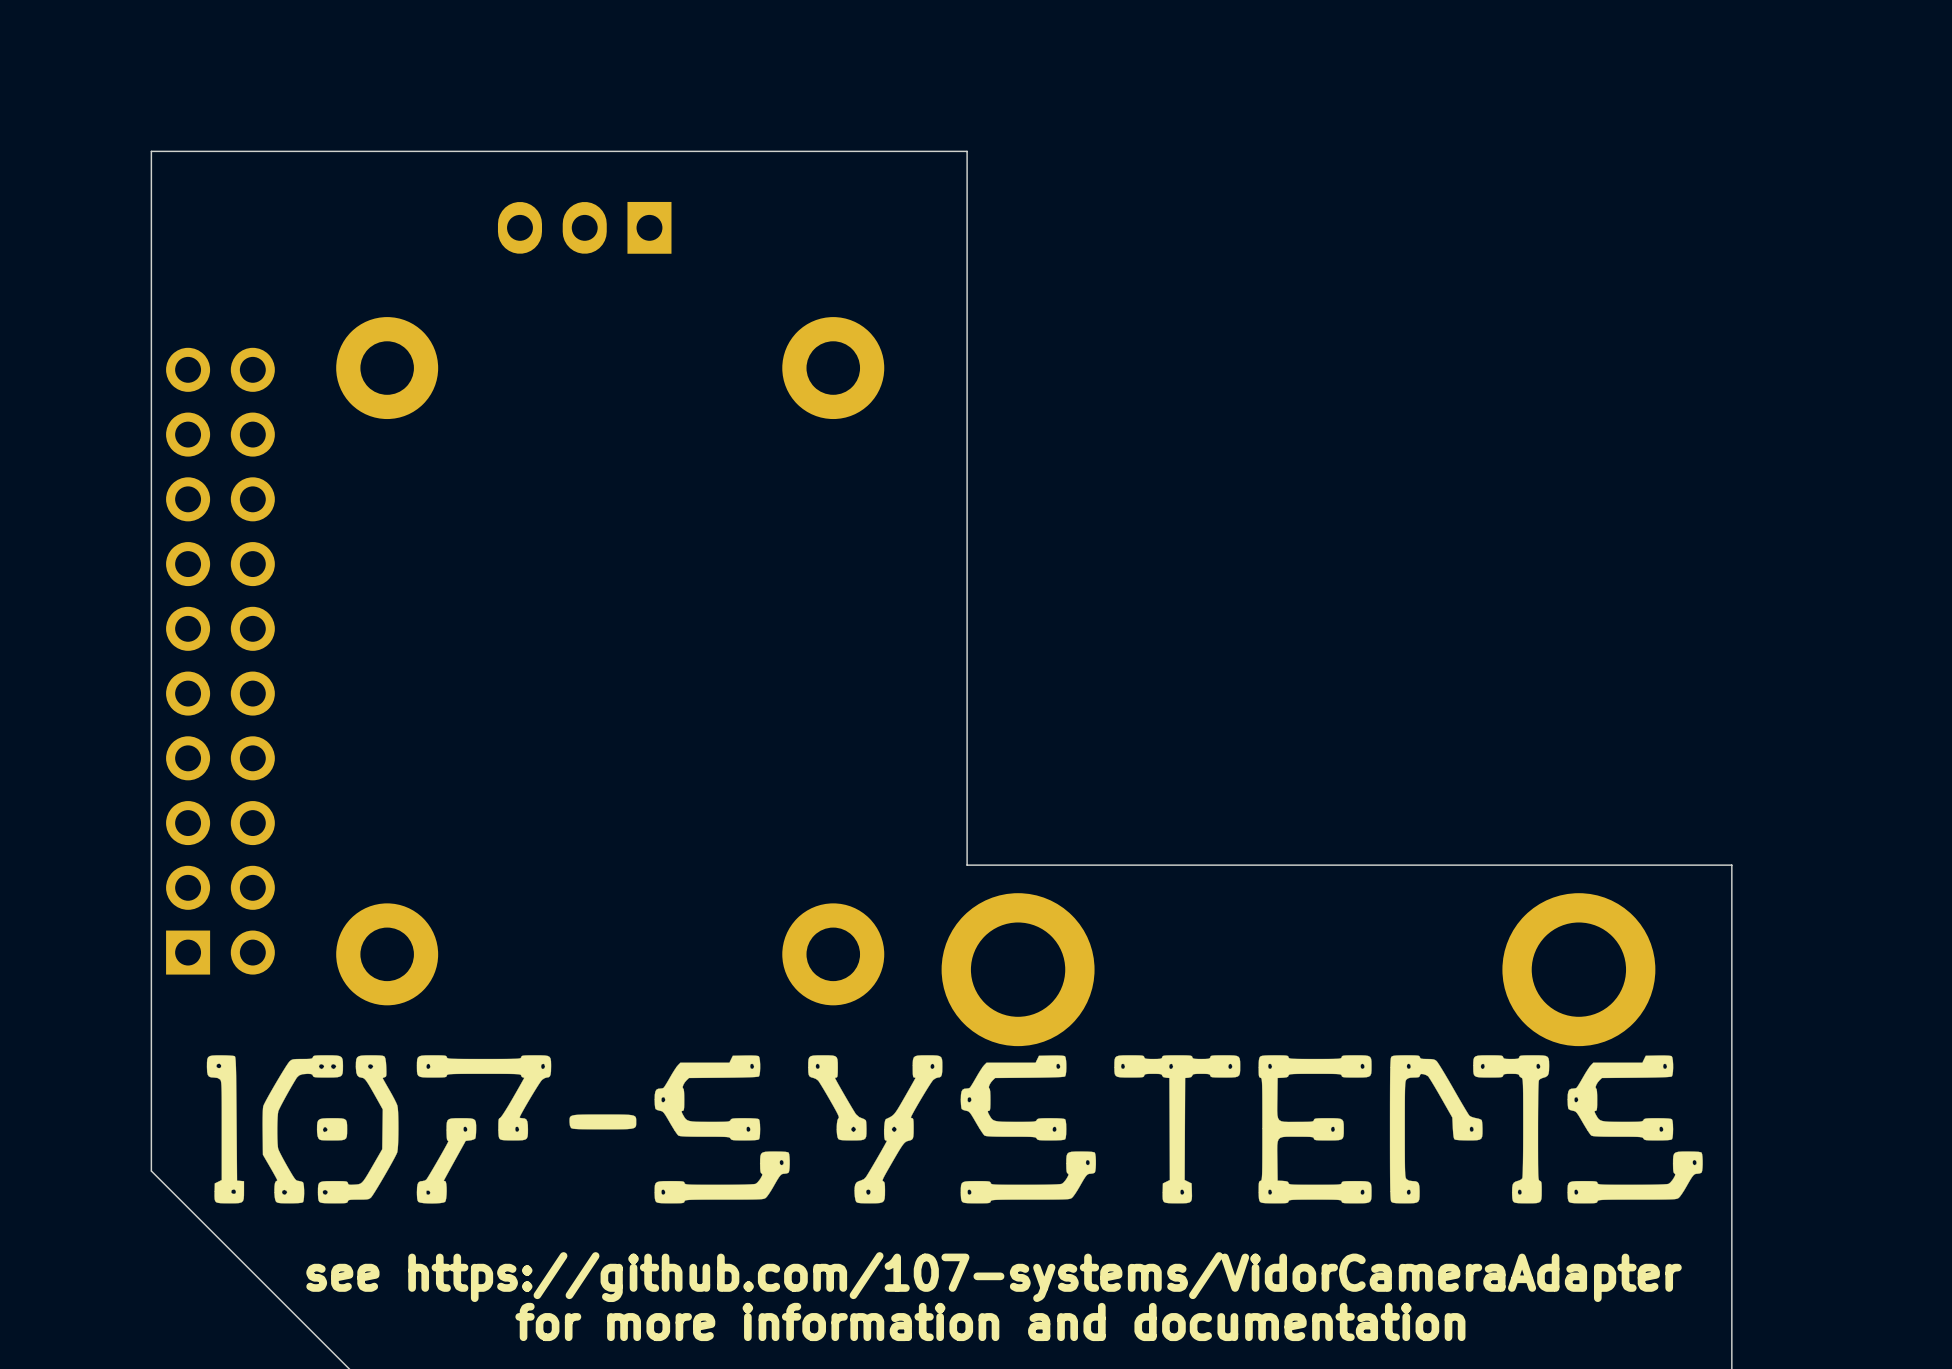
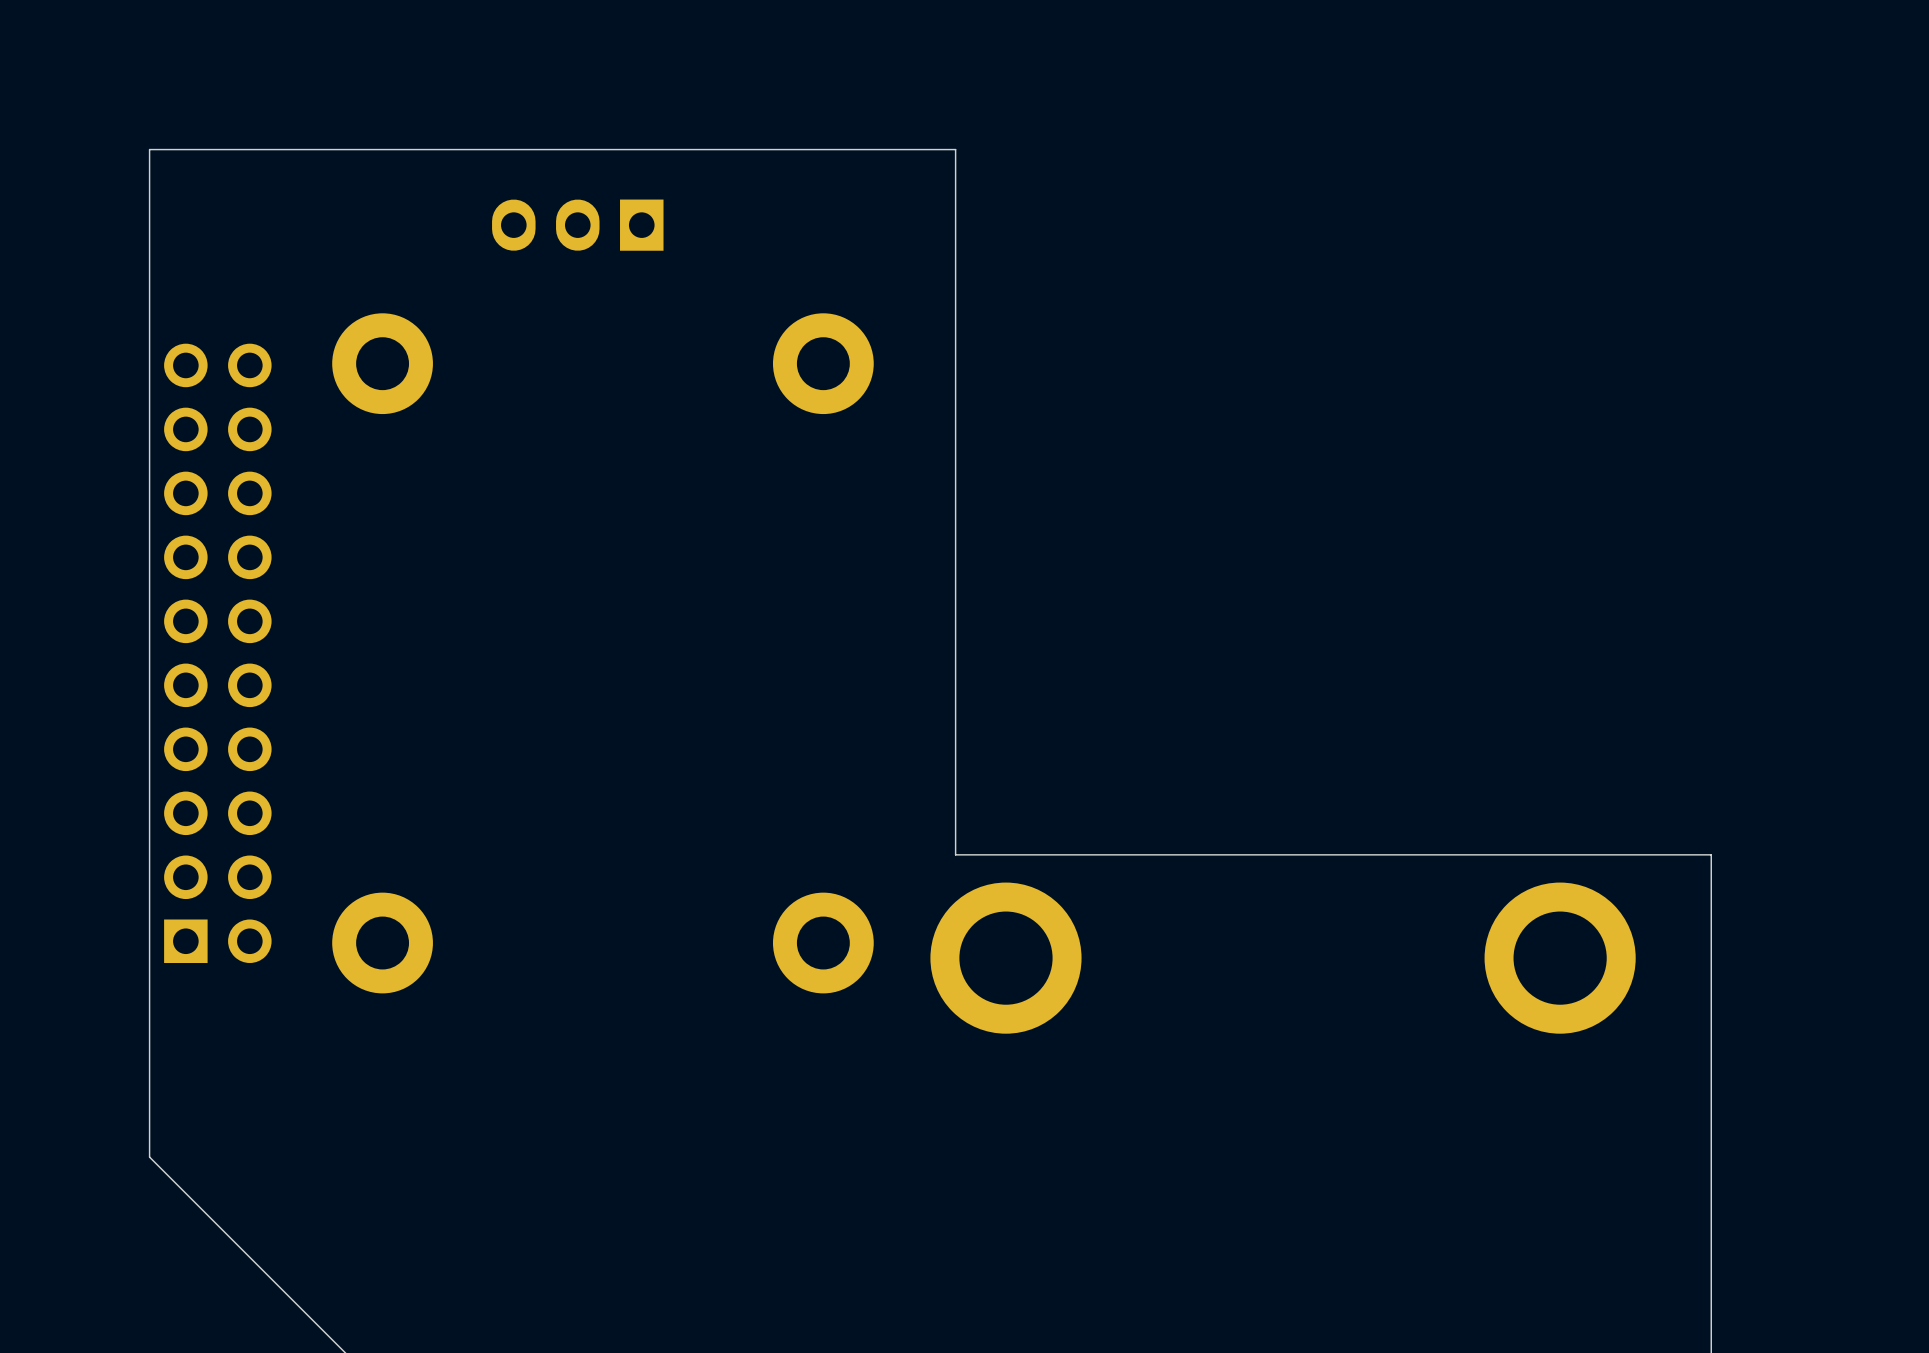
drawing: [206, 1055, 1703, 1204] -> none
text: see https://github.com/107-systems/VidorCameraAdapter (994, 1277) -> none
text: for more information and documentation (990, 1321) -> none

